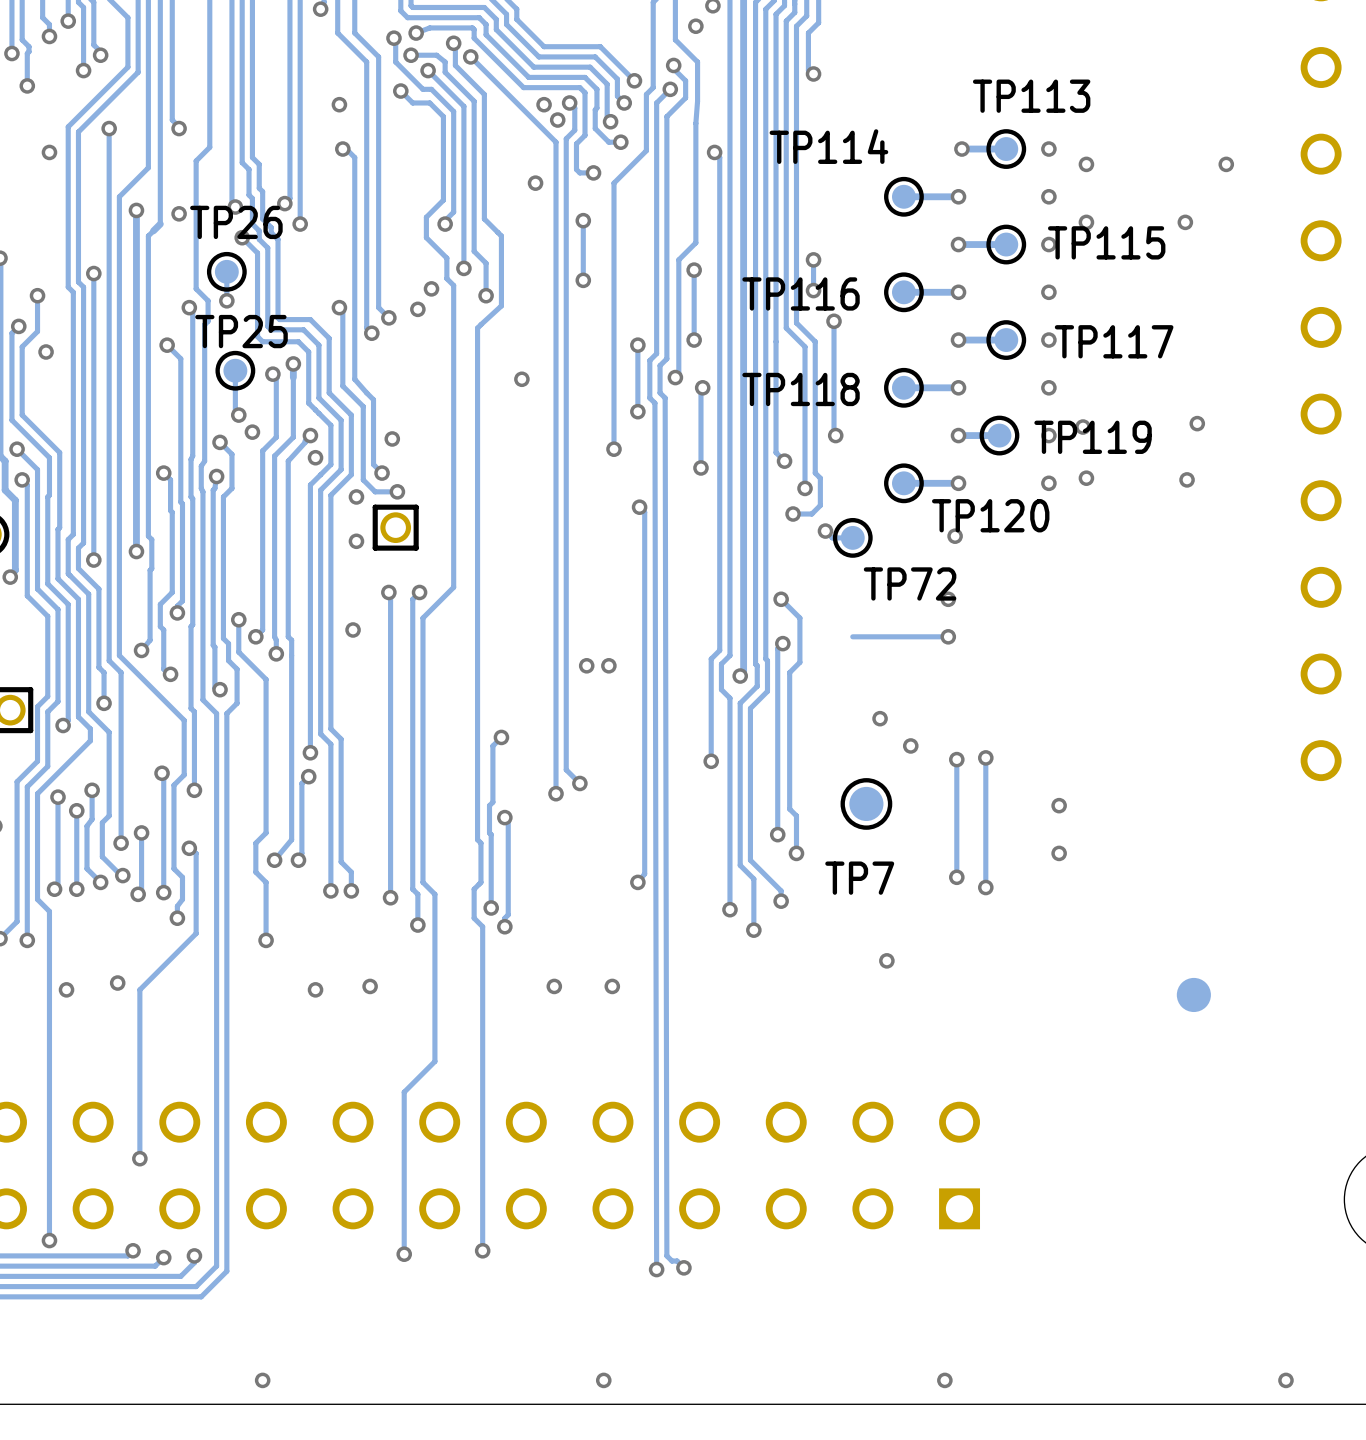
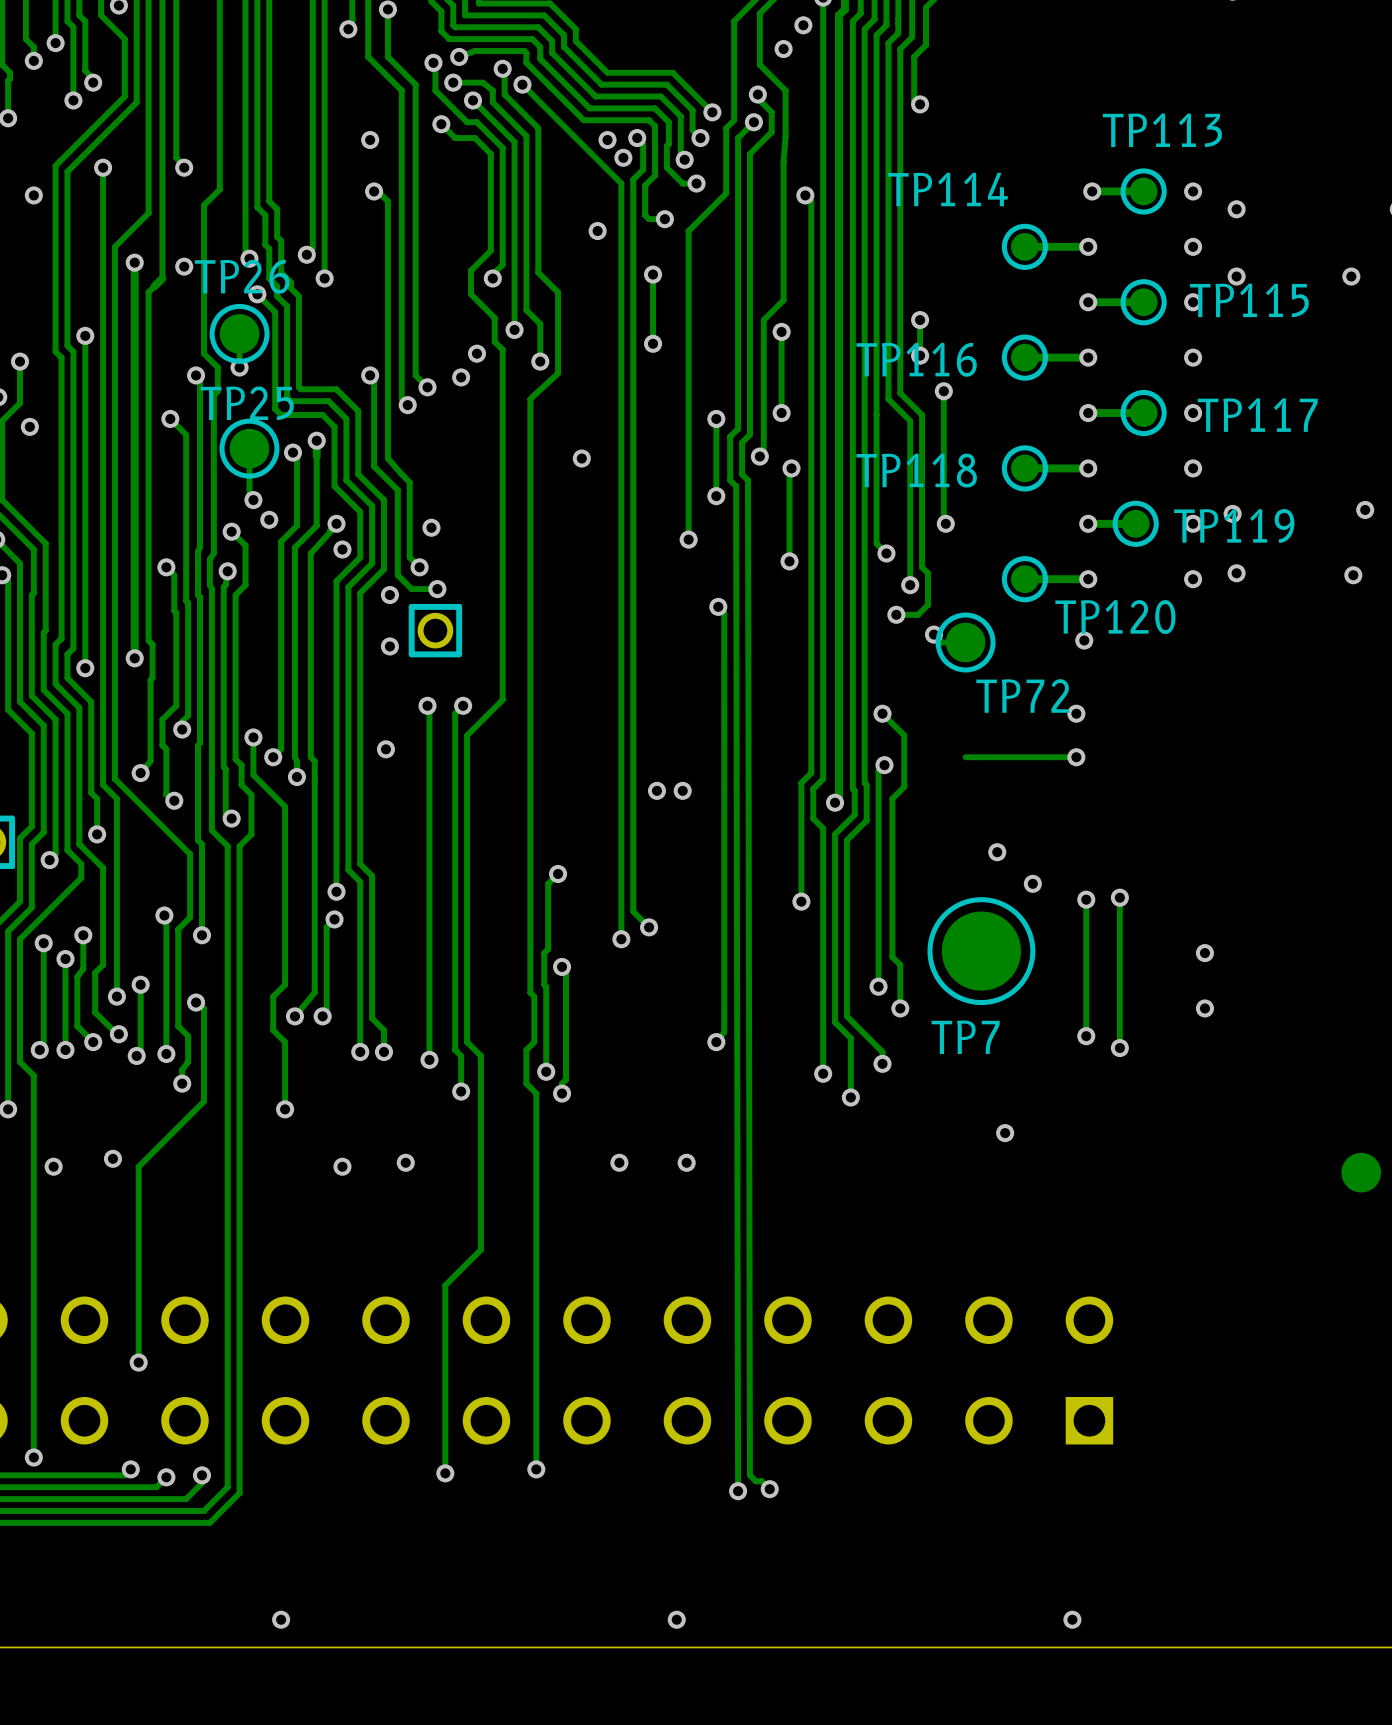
TP26 footprint: [206, 251, 247, 292] -> [209, 303, 270, 364]
TP25 footprint: [215, 350, 256, 391] -> [219, 418, 280, 479]
TP72 footprint: [832, 517, 873, 558] -> [935, 612, 996, 673]
TP7 footprint: [840, 778, 893, 830] -> [927, 897, 1036, 1006]

